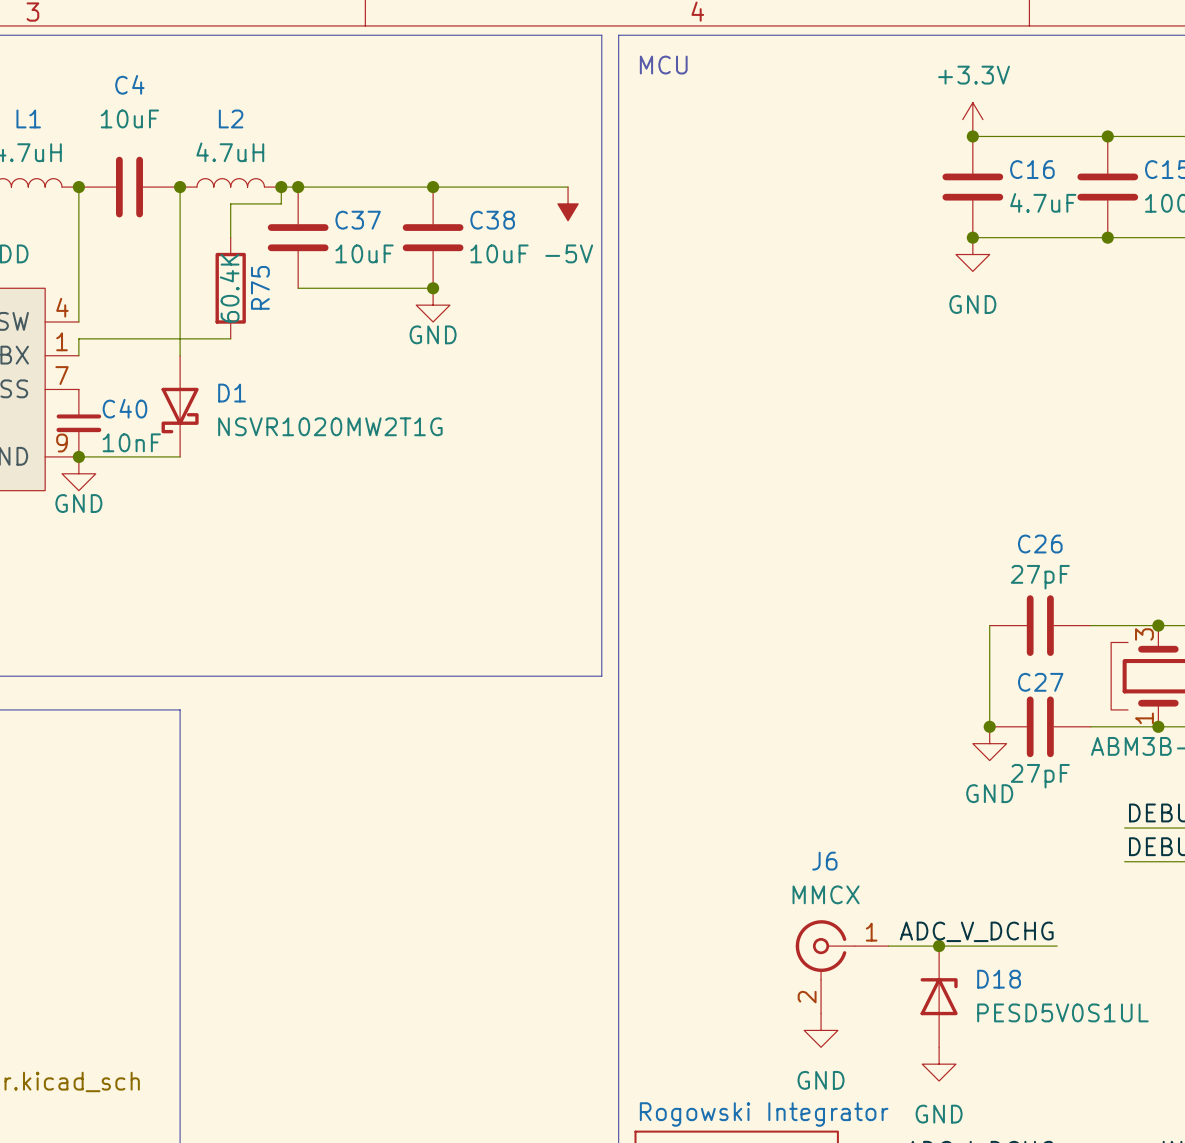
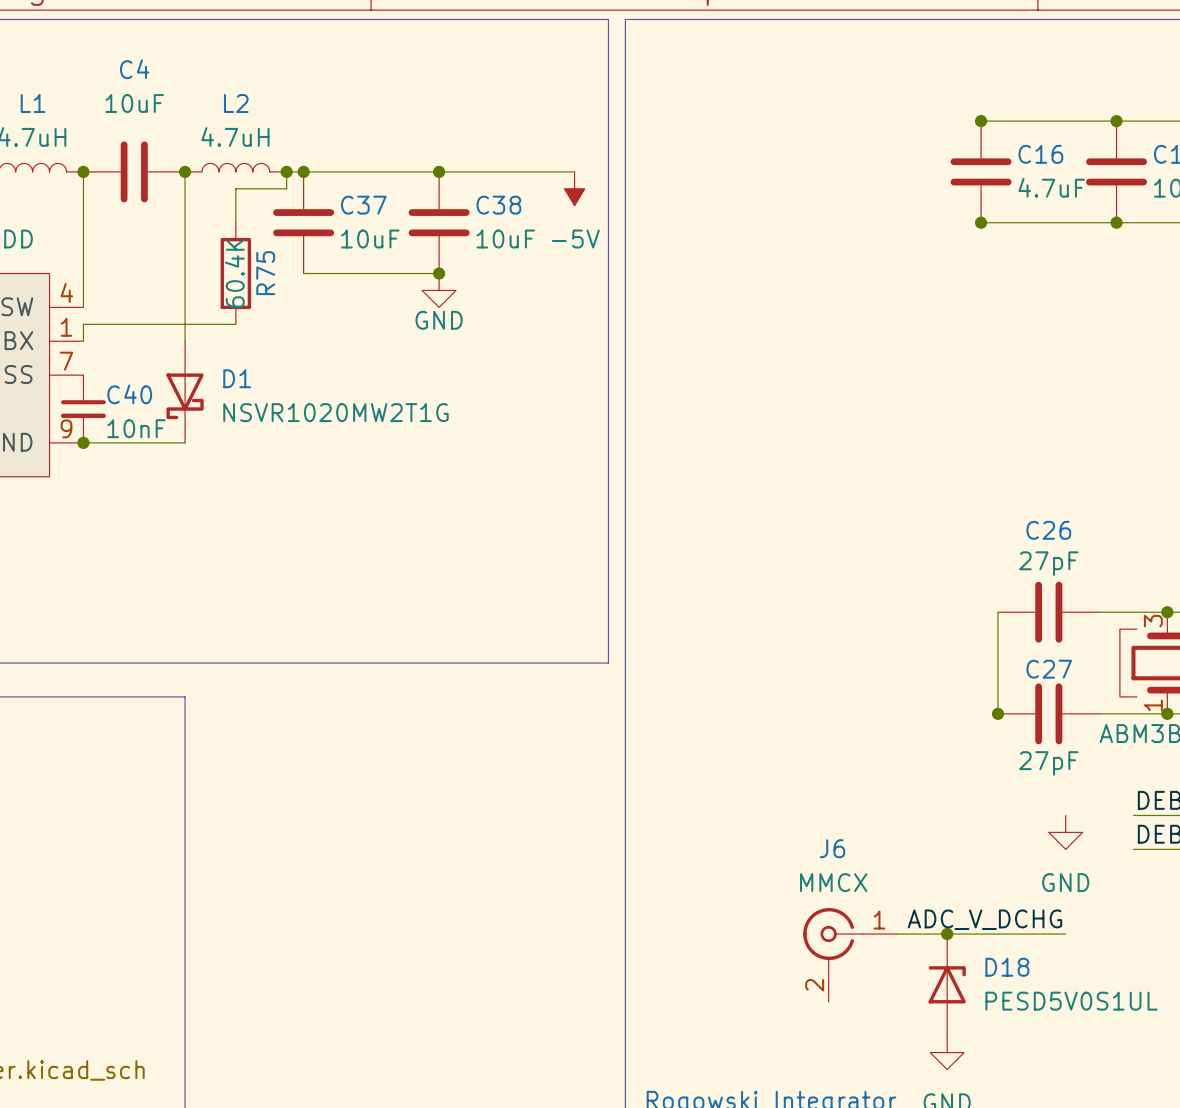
text: MCU (663, 65) -> none
power symbol: +3.3V (972, 119) -> none
power symbol: GND (972, 254) -> none
power symbol: GND (78, 473) -> none
power symbol position: GND (989, 743) -> GND (1065, 832)
power symbol: GND (821, 1030) -> none

